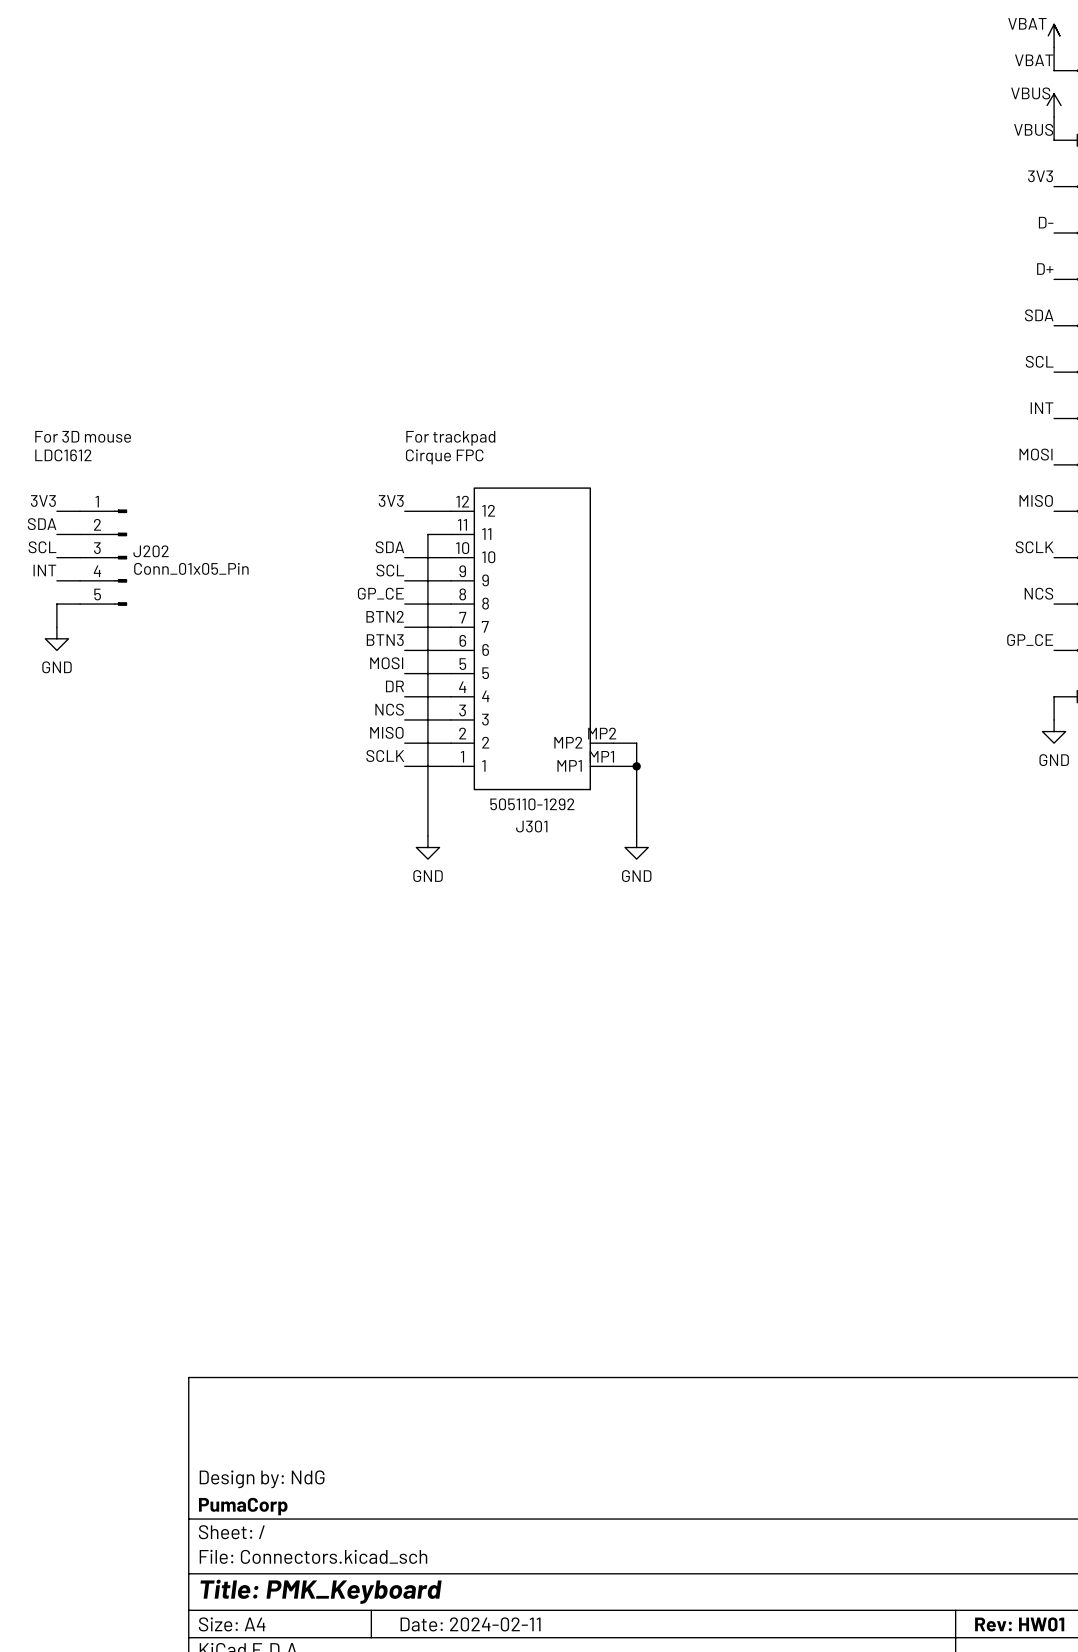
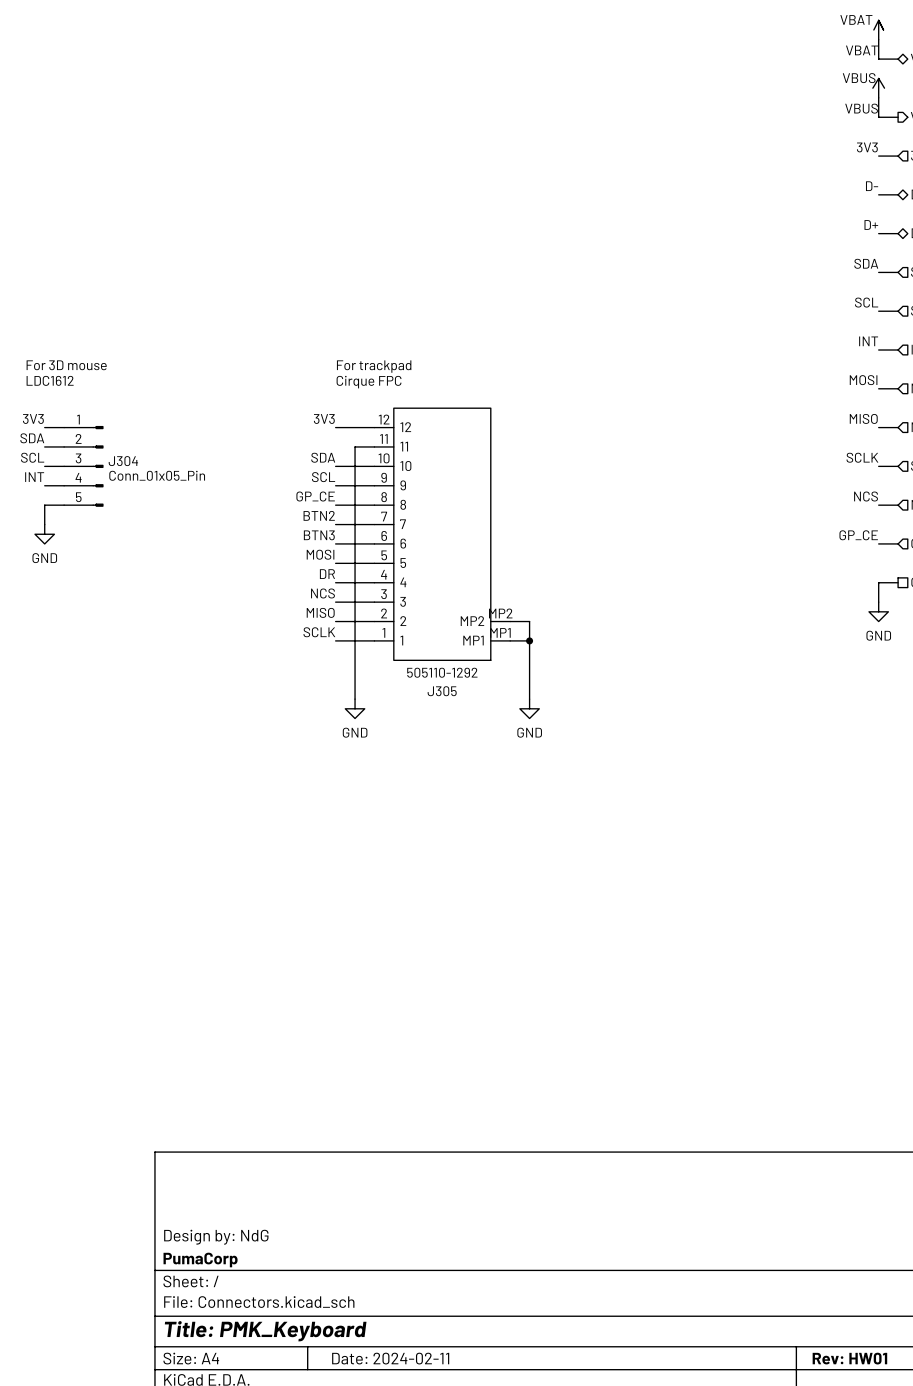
J202 name: J202 (151, 551) -> J304 (123, 461)
J301 name: J301 (531, 826) -> J305 (442, 691)

